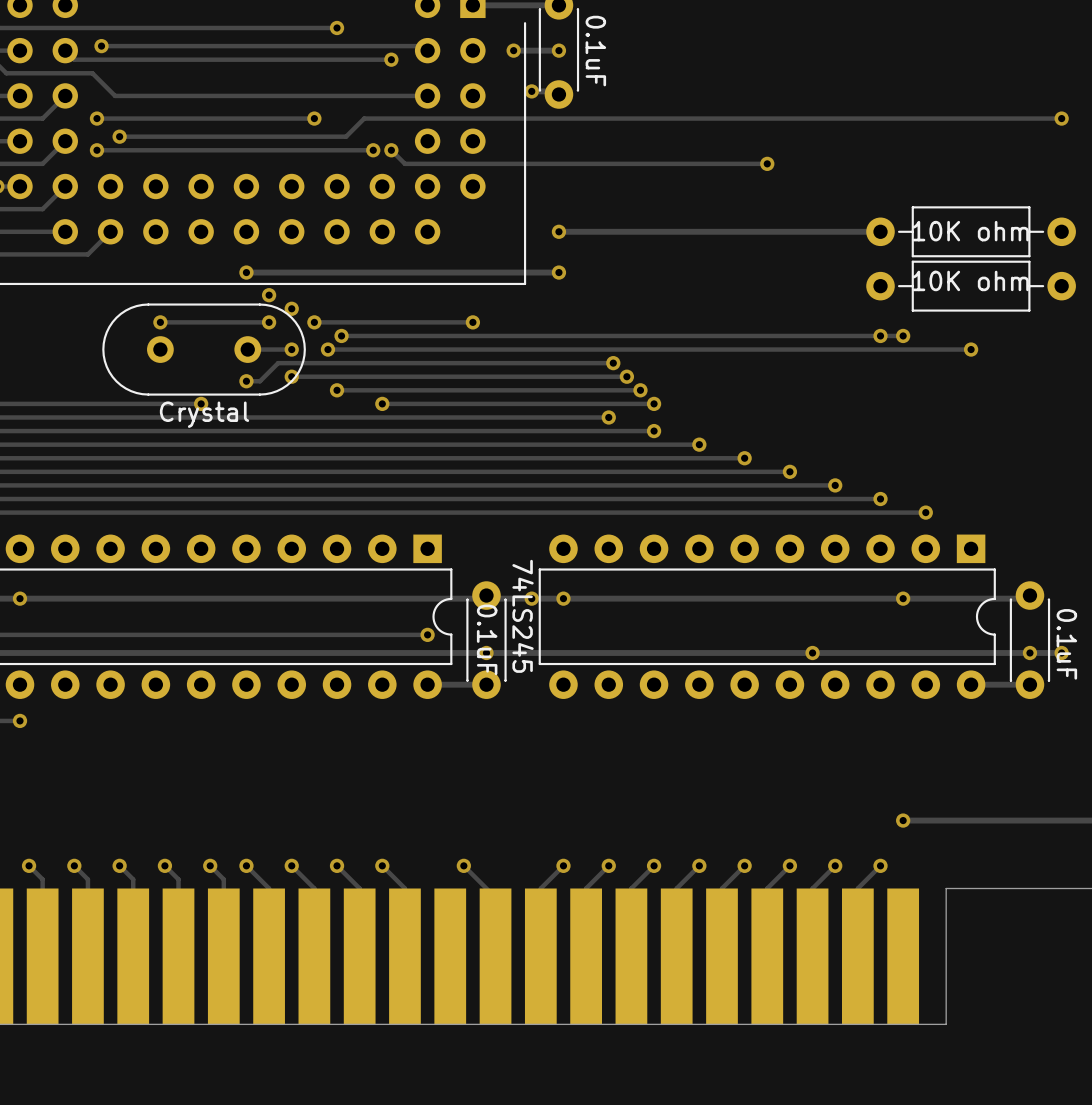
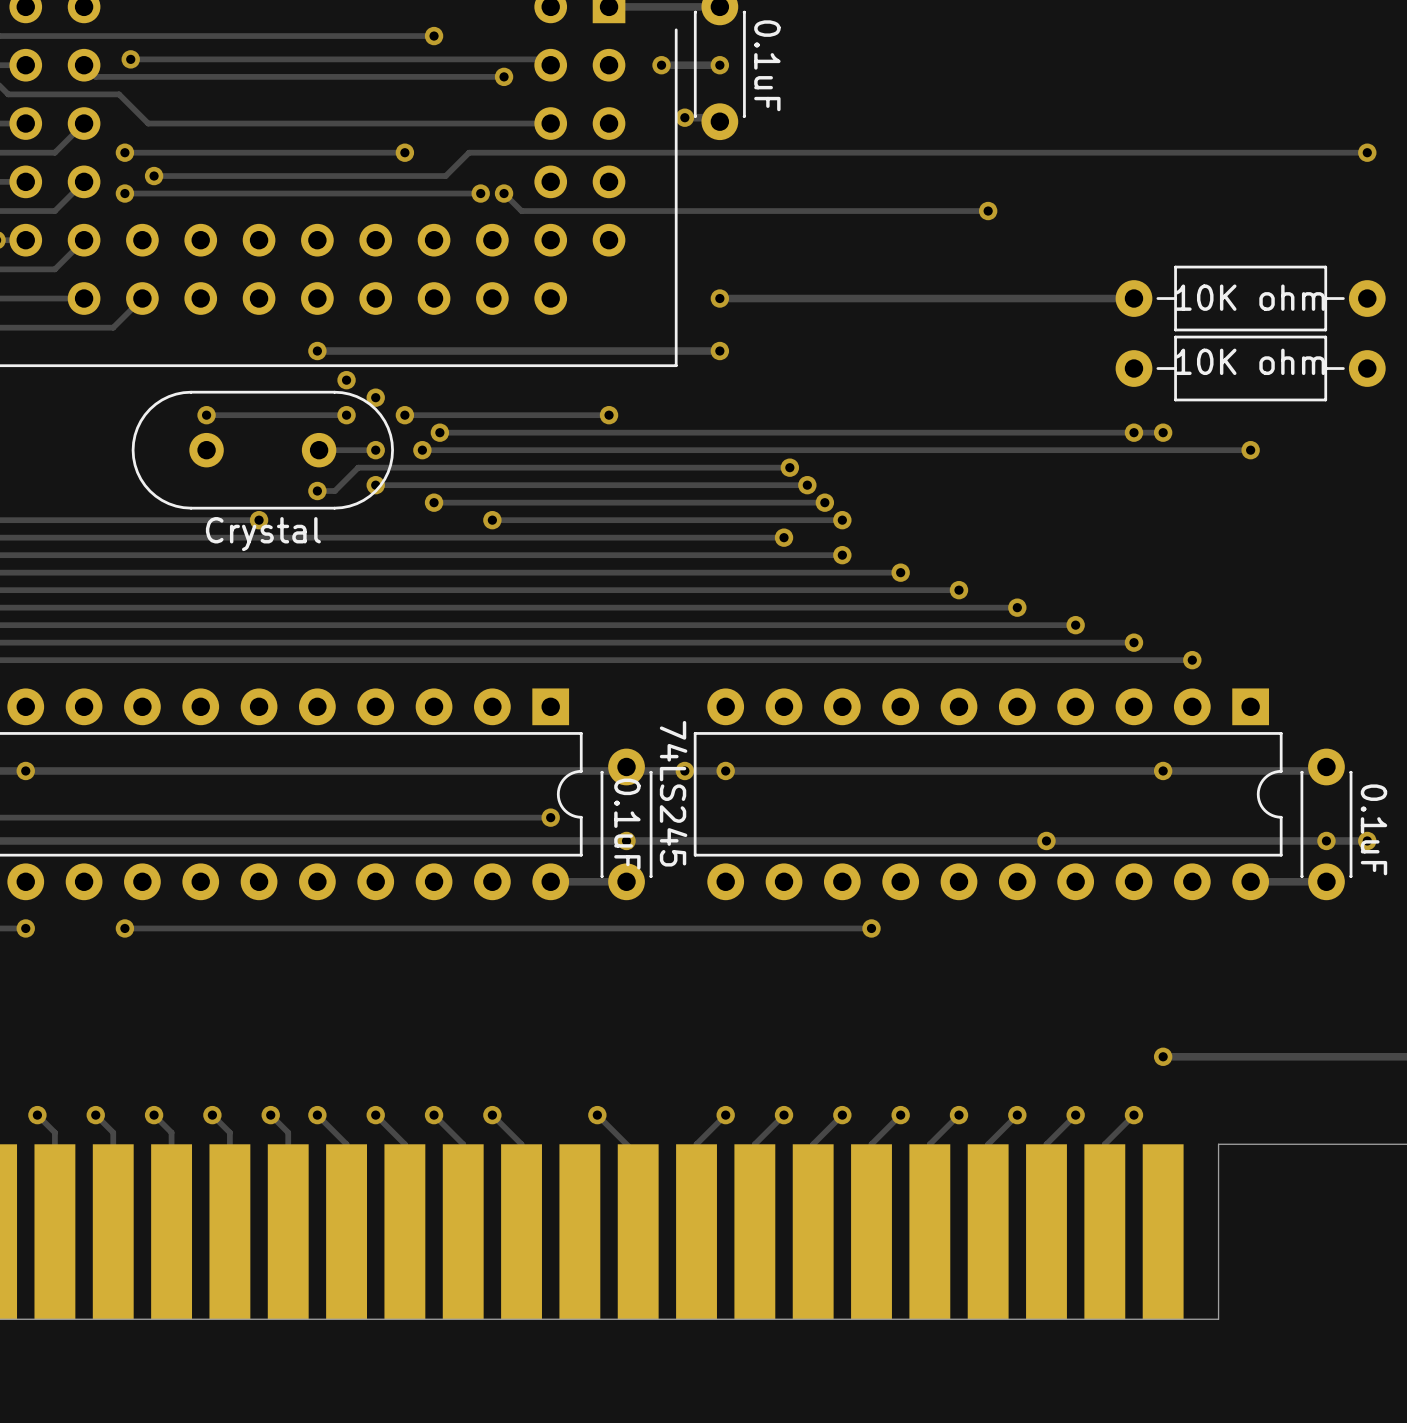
track: none -> (124, 928) (871, 928)
via: none -> (124, 928)
via: none -> (871, 928)

